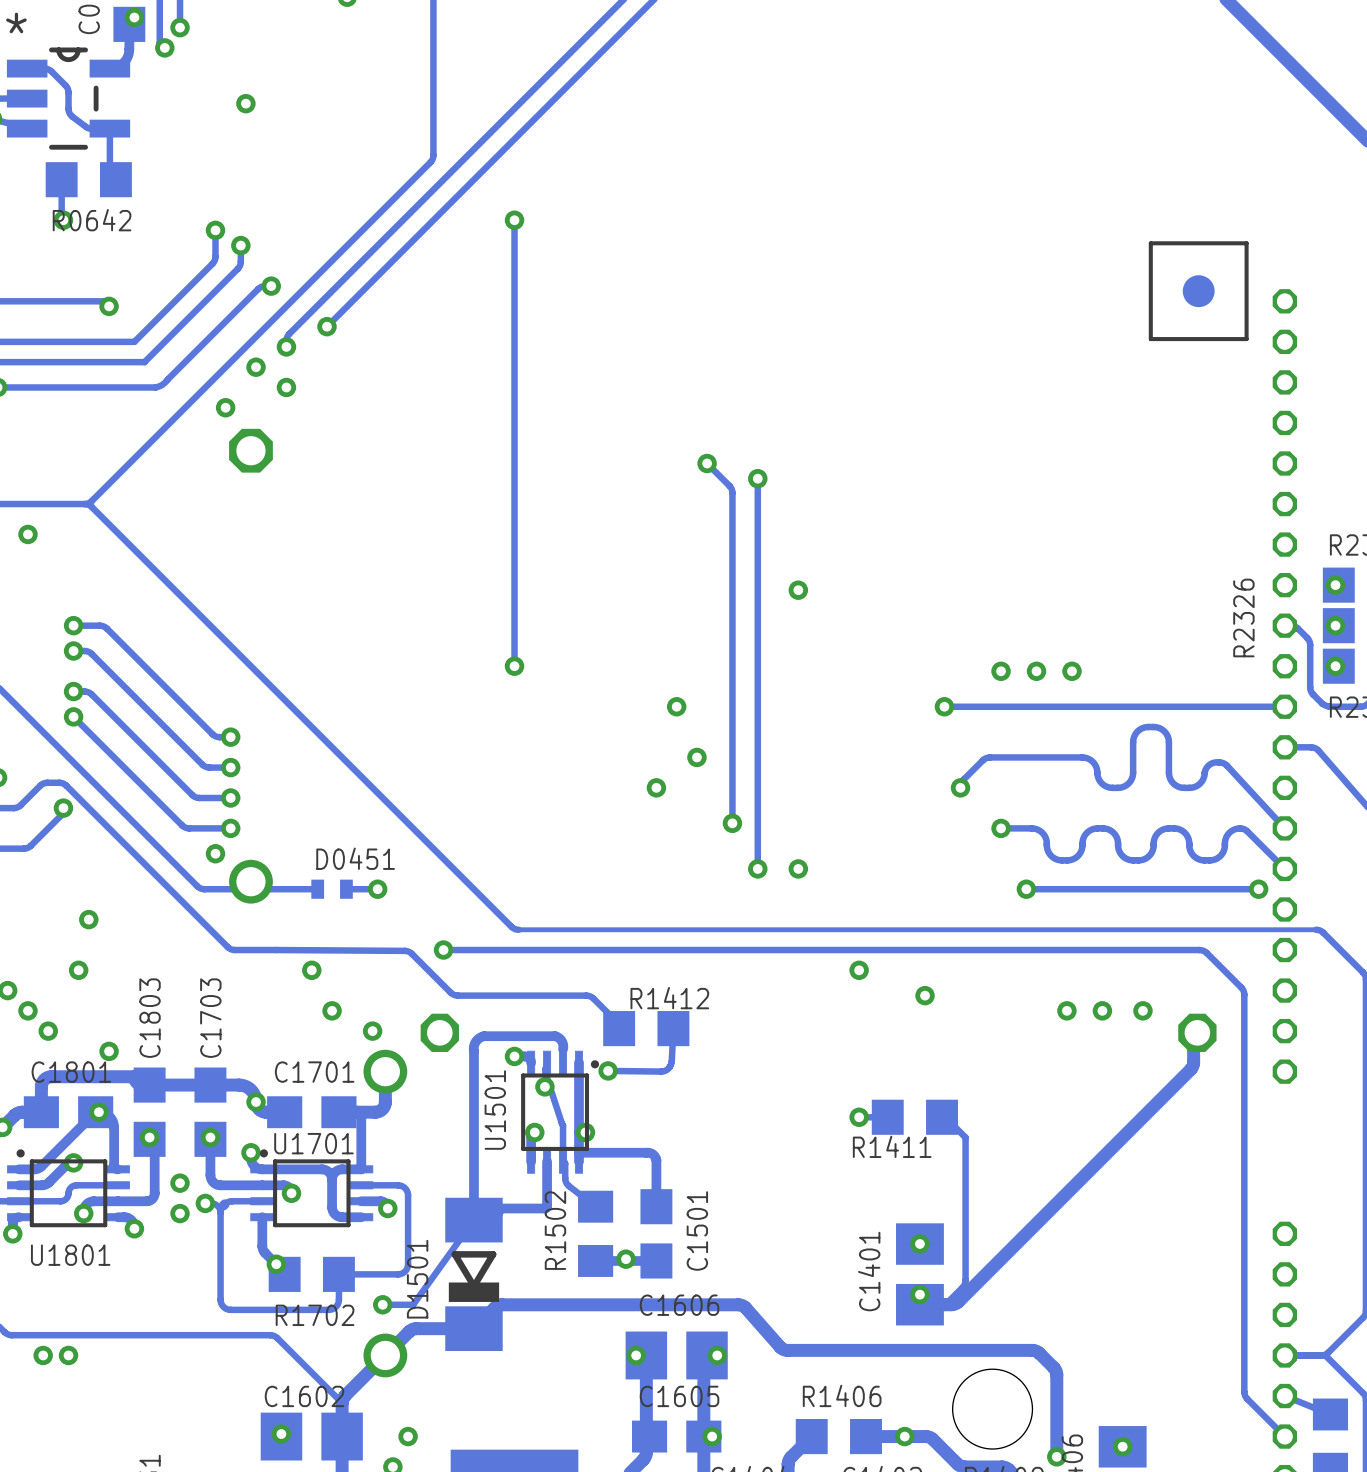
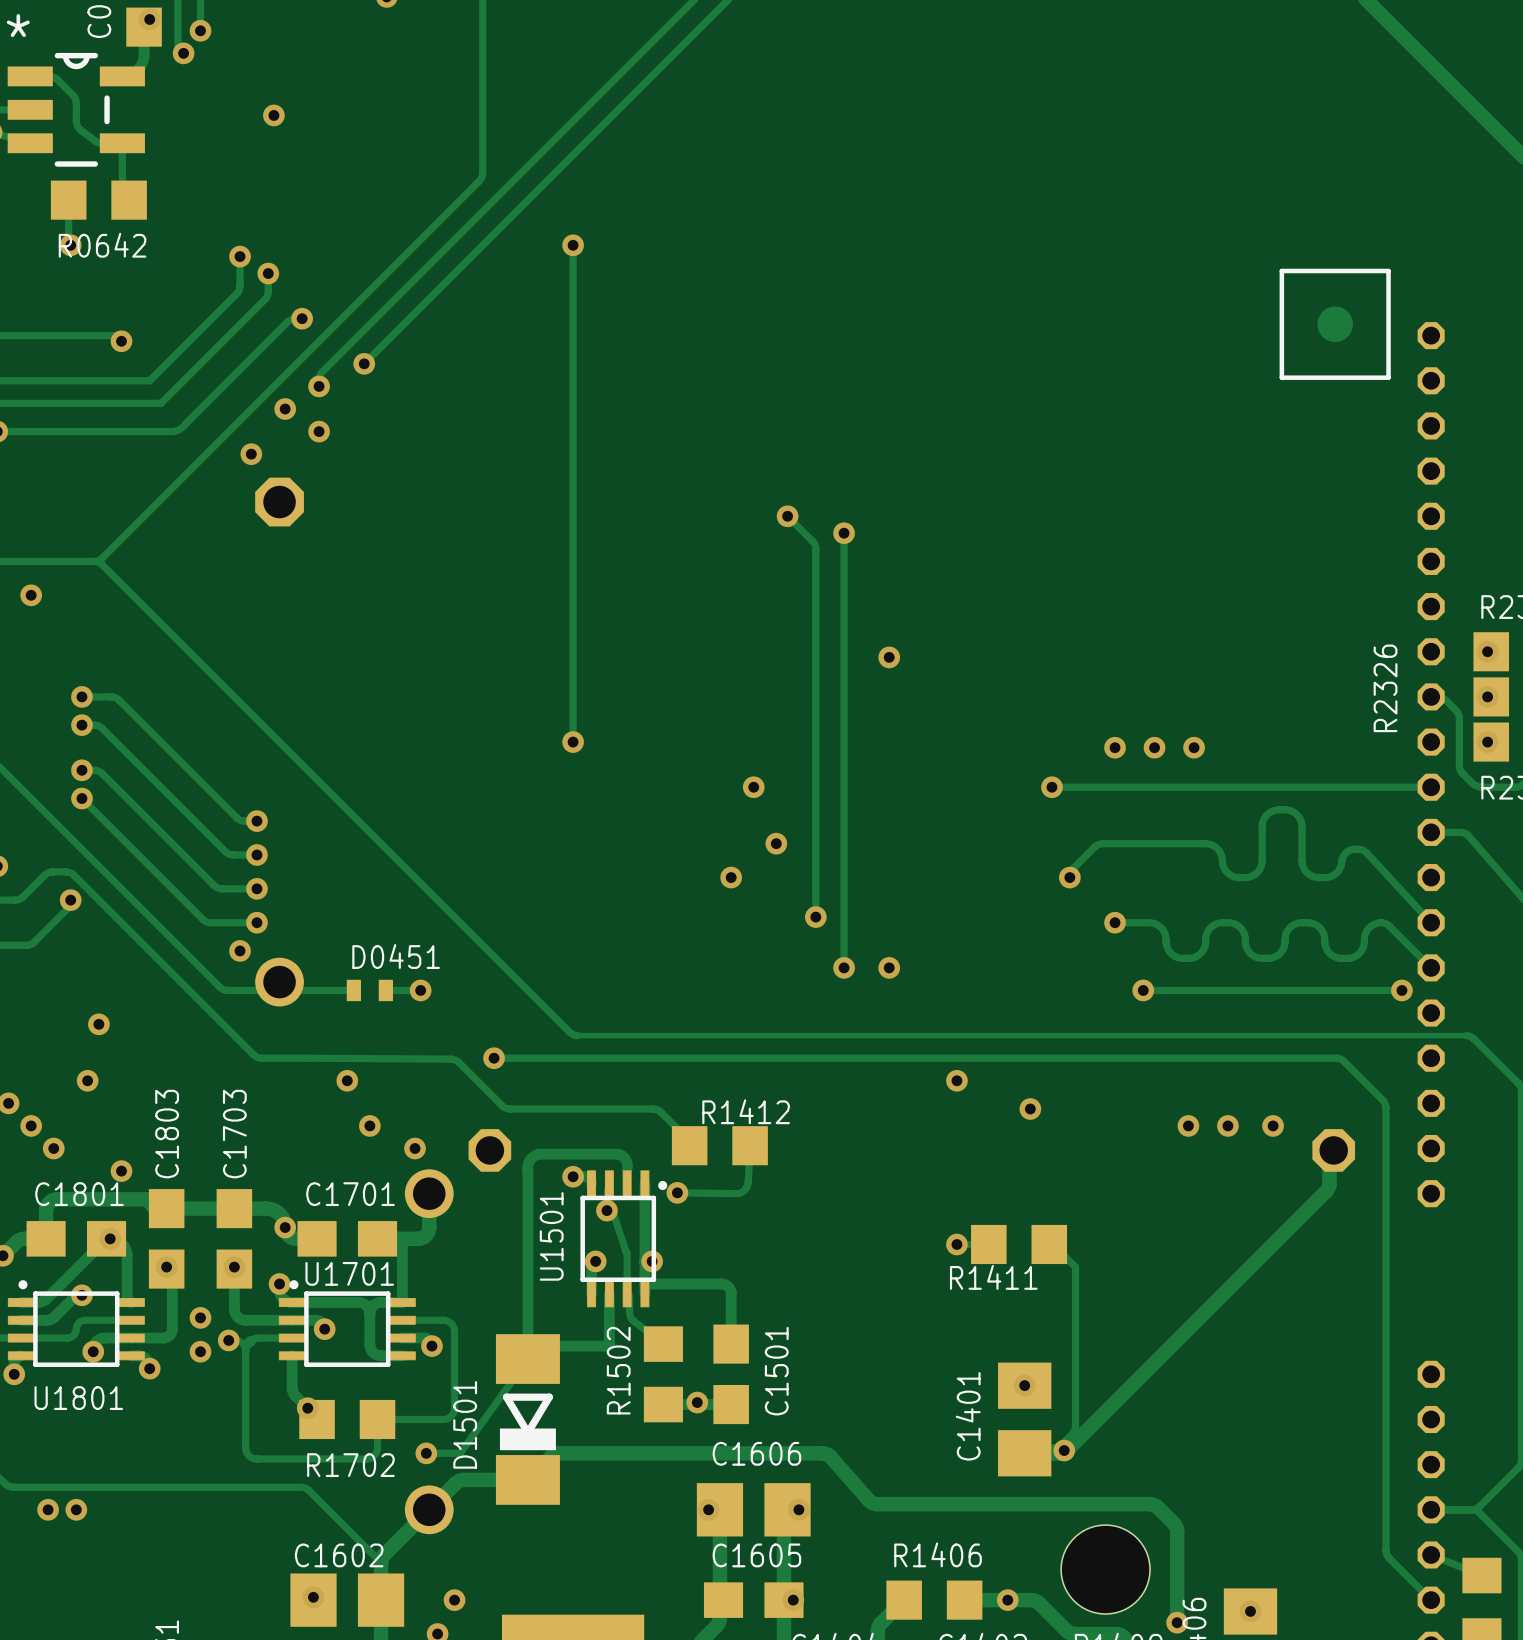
via position: (919, 1294) -> (1064, 1450)

